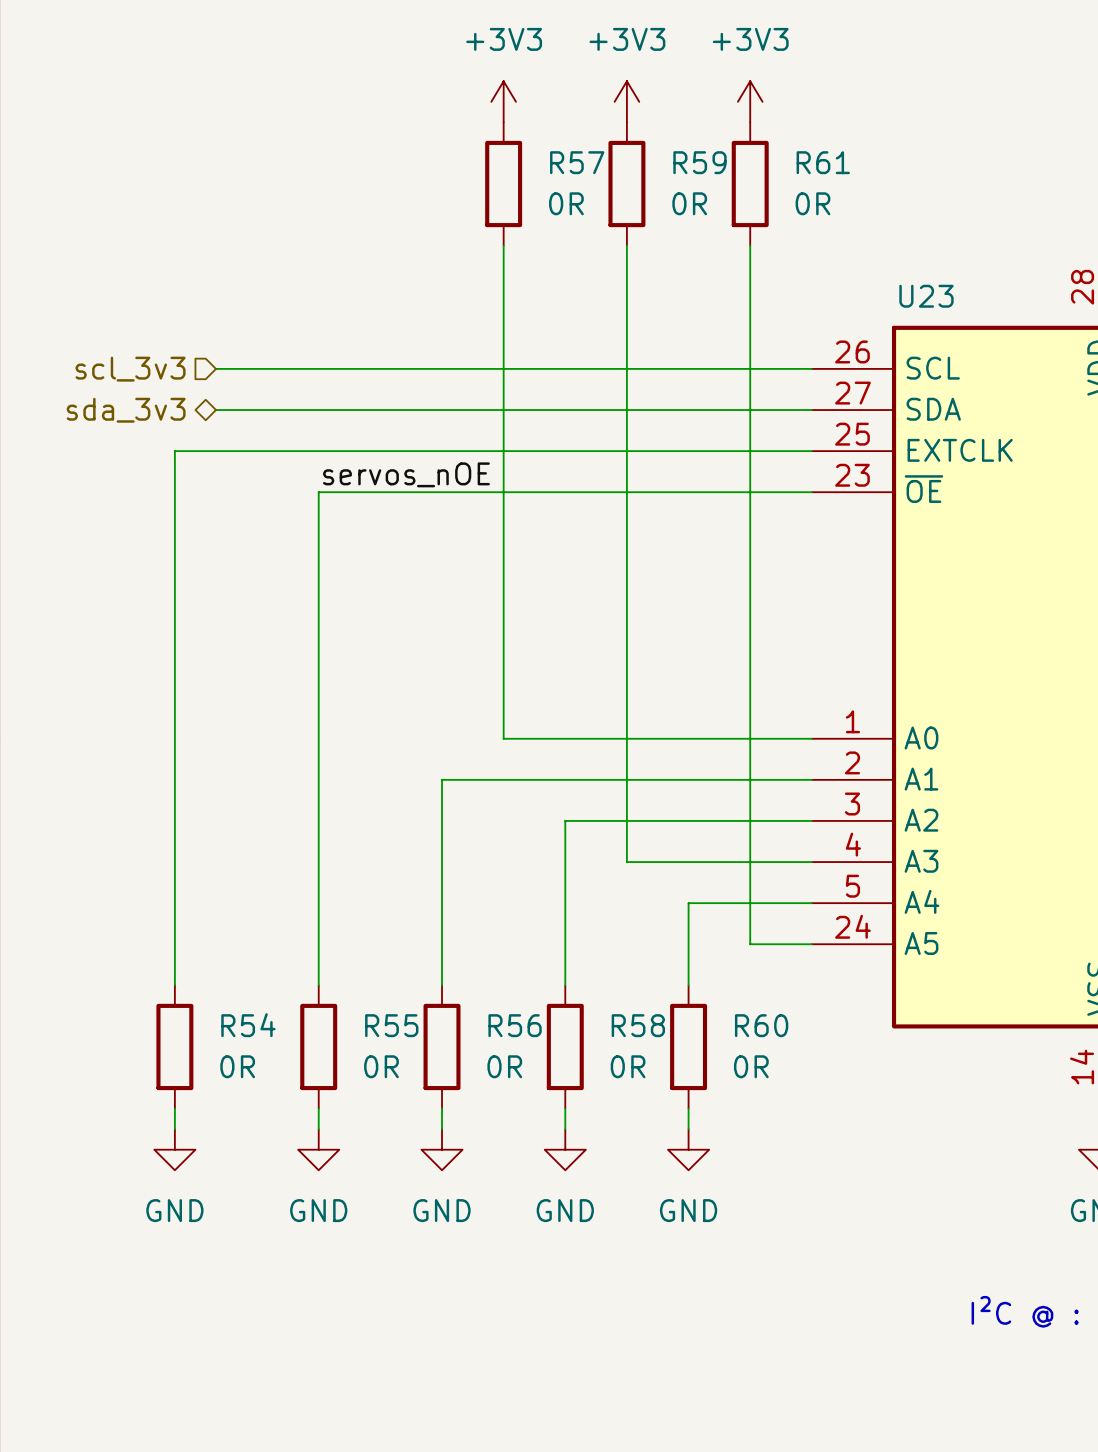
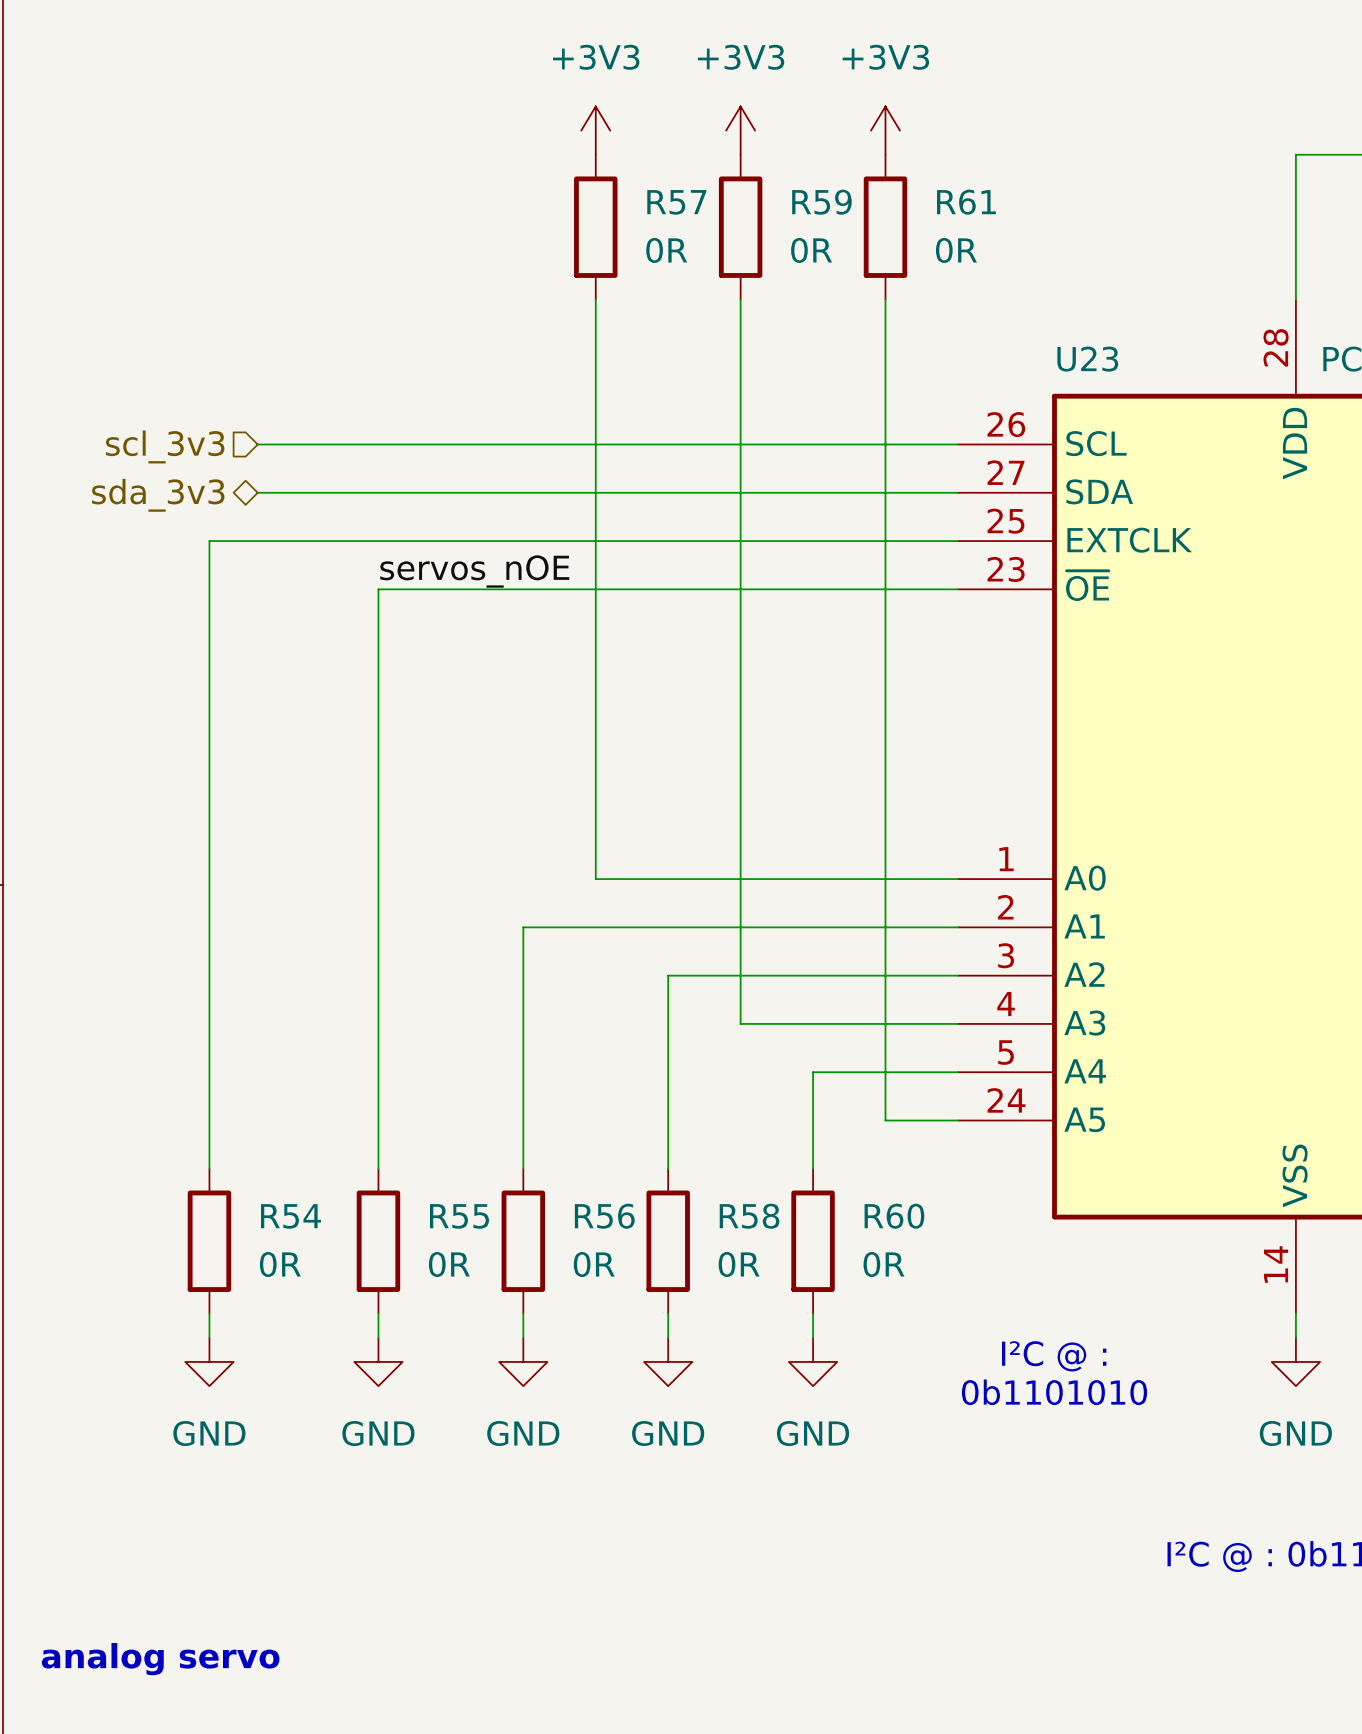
text: none -> I²C @ : (1054, 1356)
text: none -> 0b1101010 (1054, 1392)
text: none -> analog servo (160, 1659)

